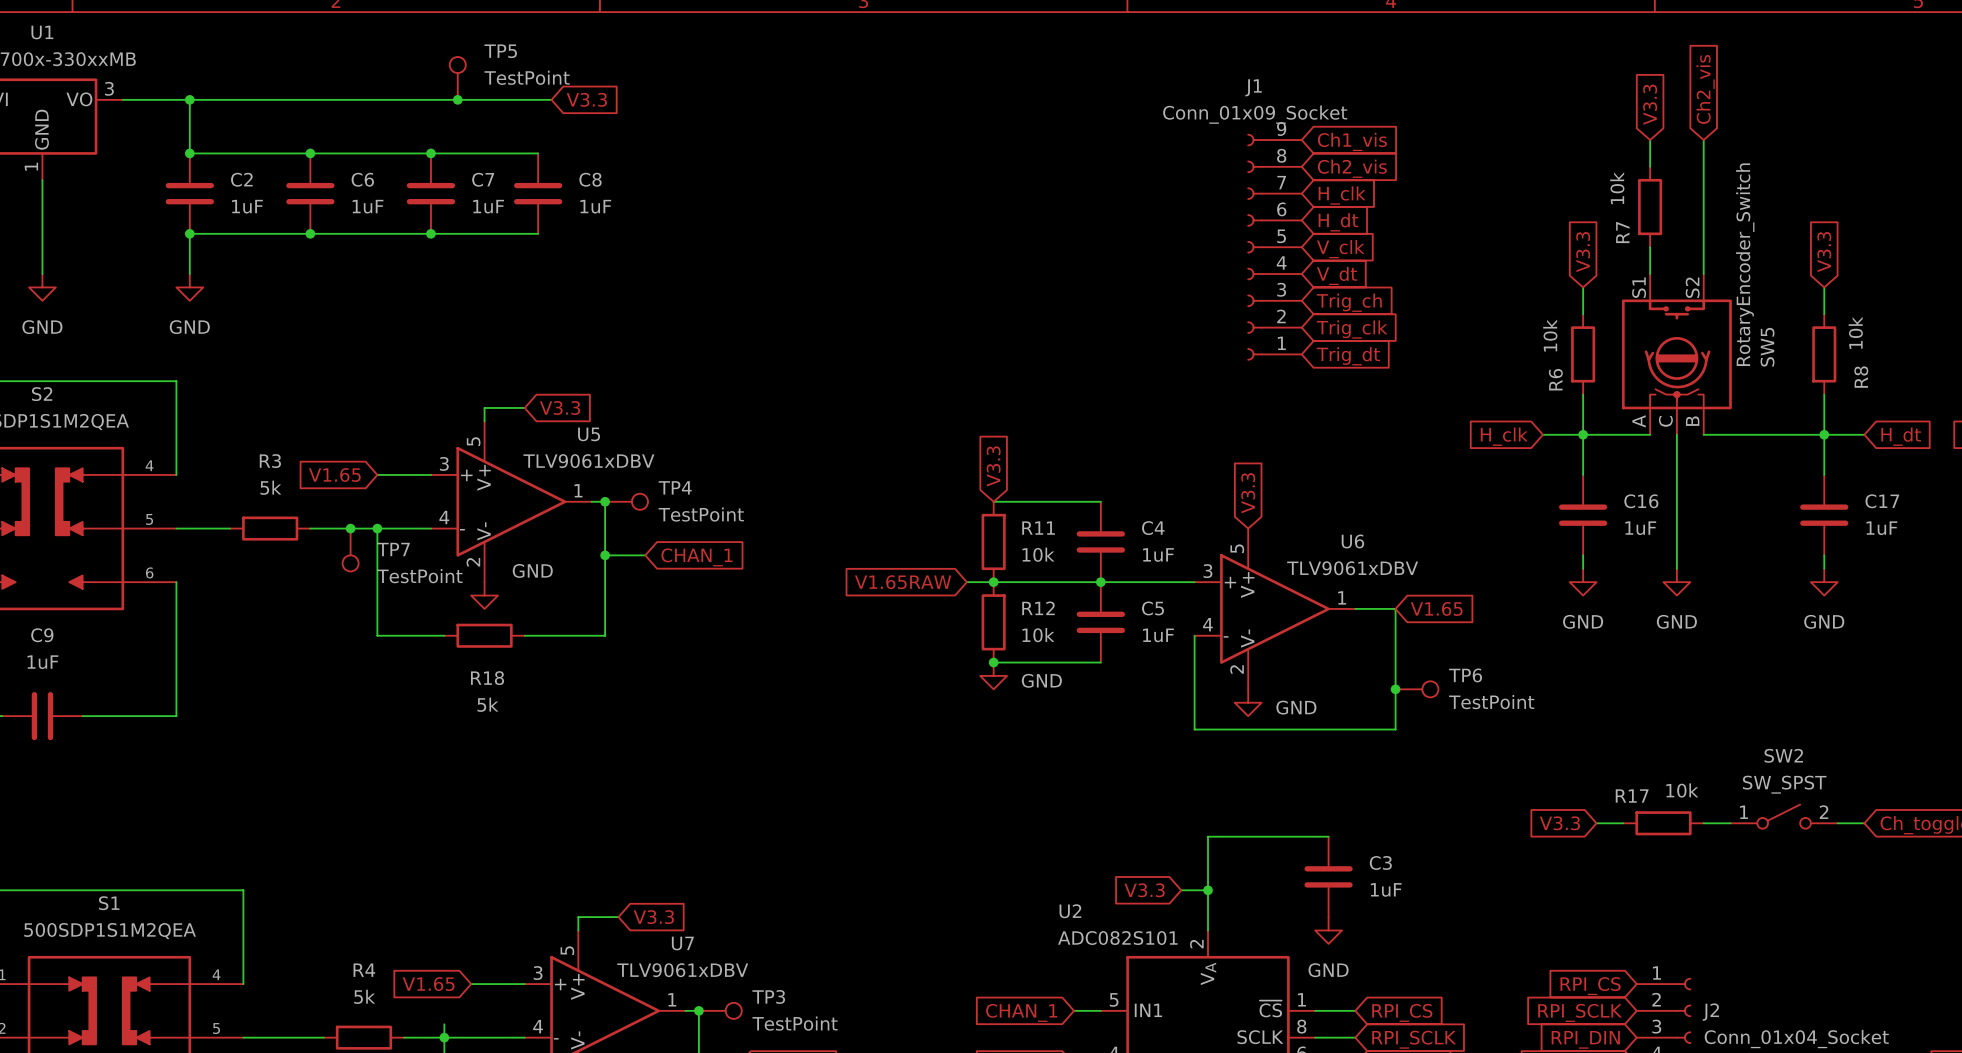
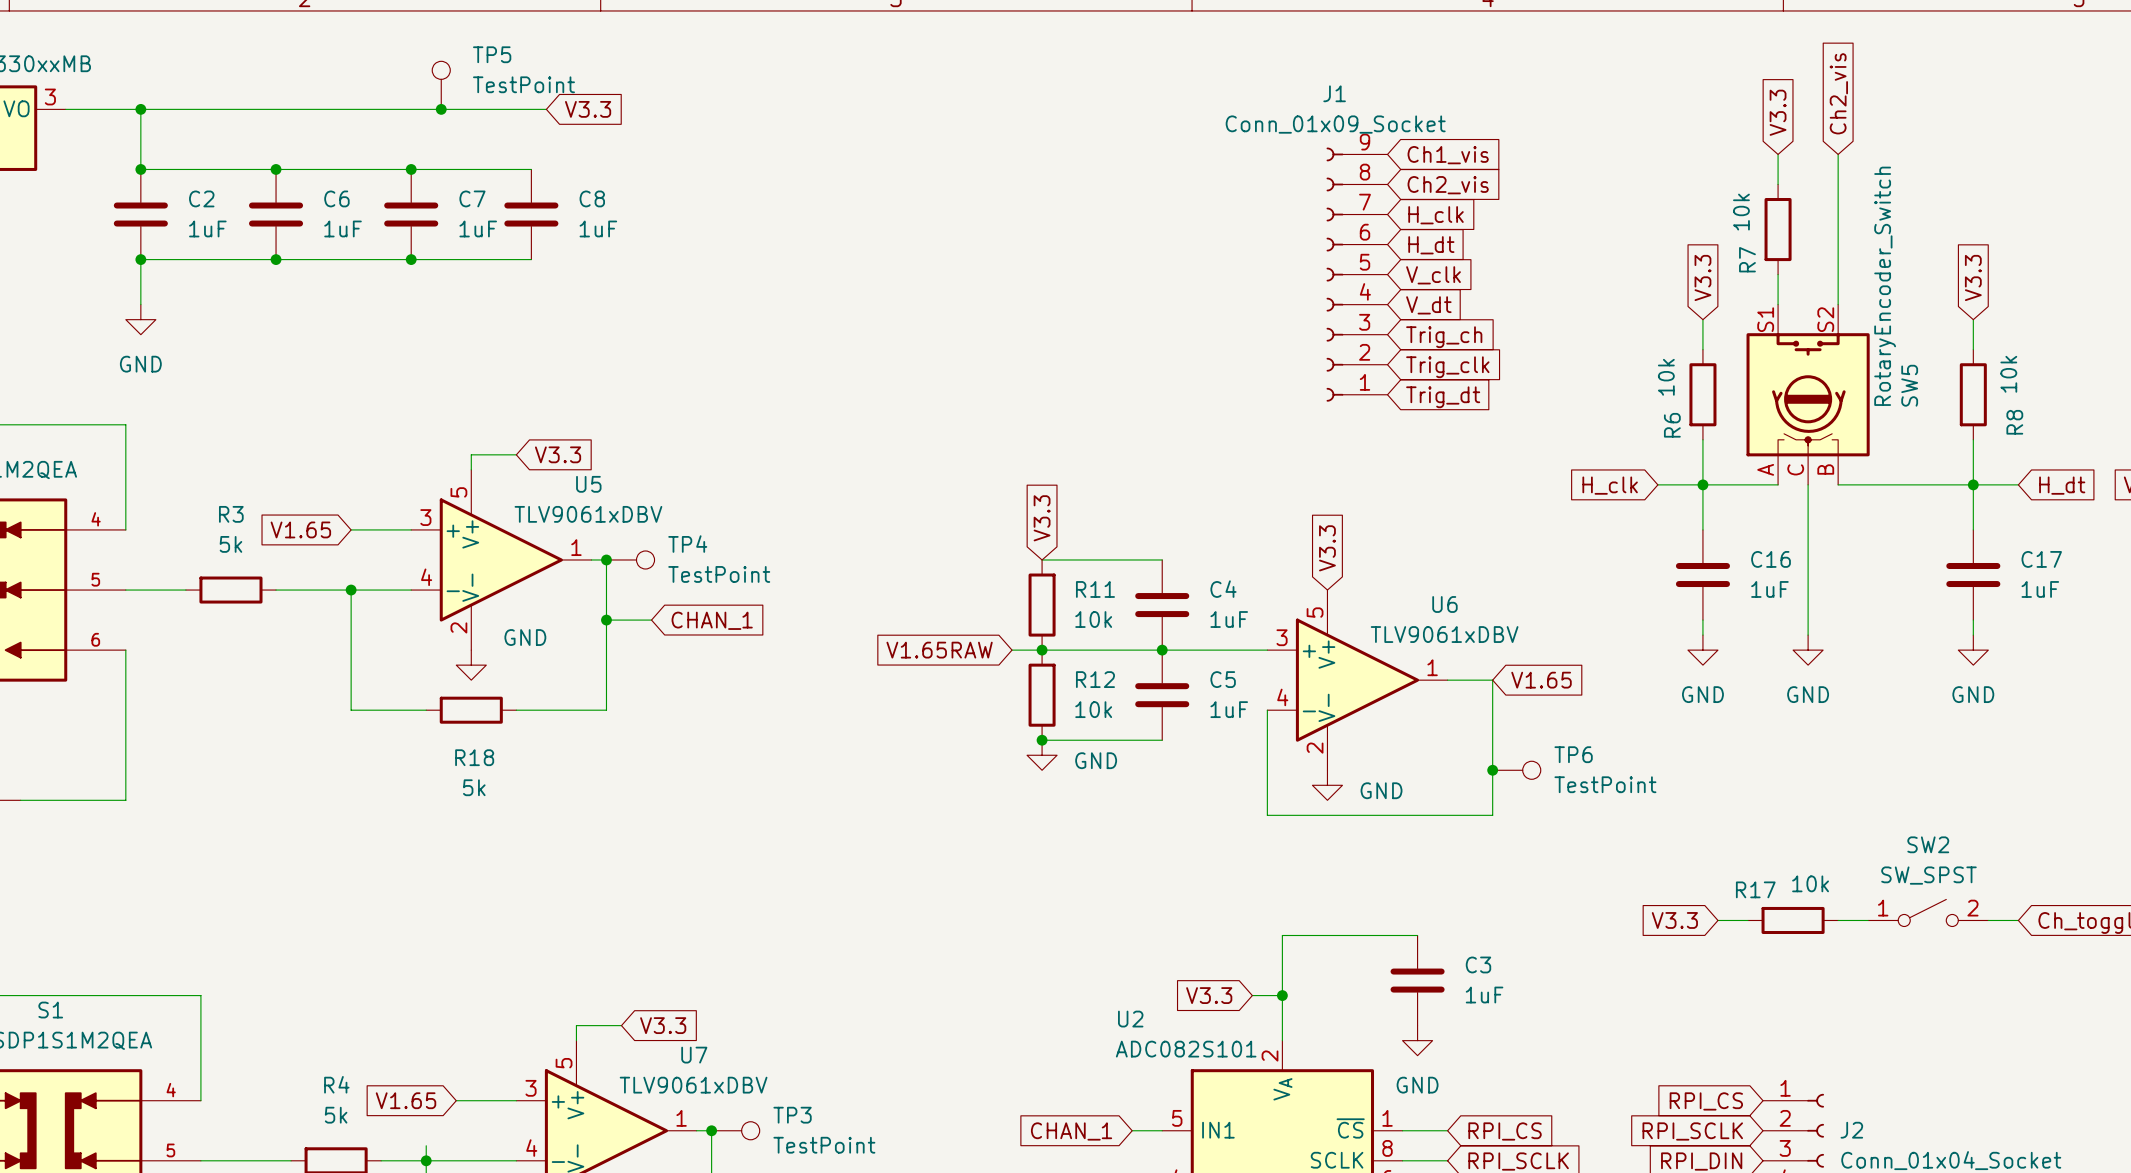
junction: (350, 528) -> none
TP7: TestPoint (350, 550) -> none

